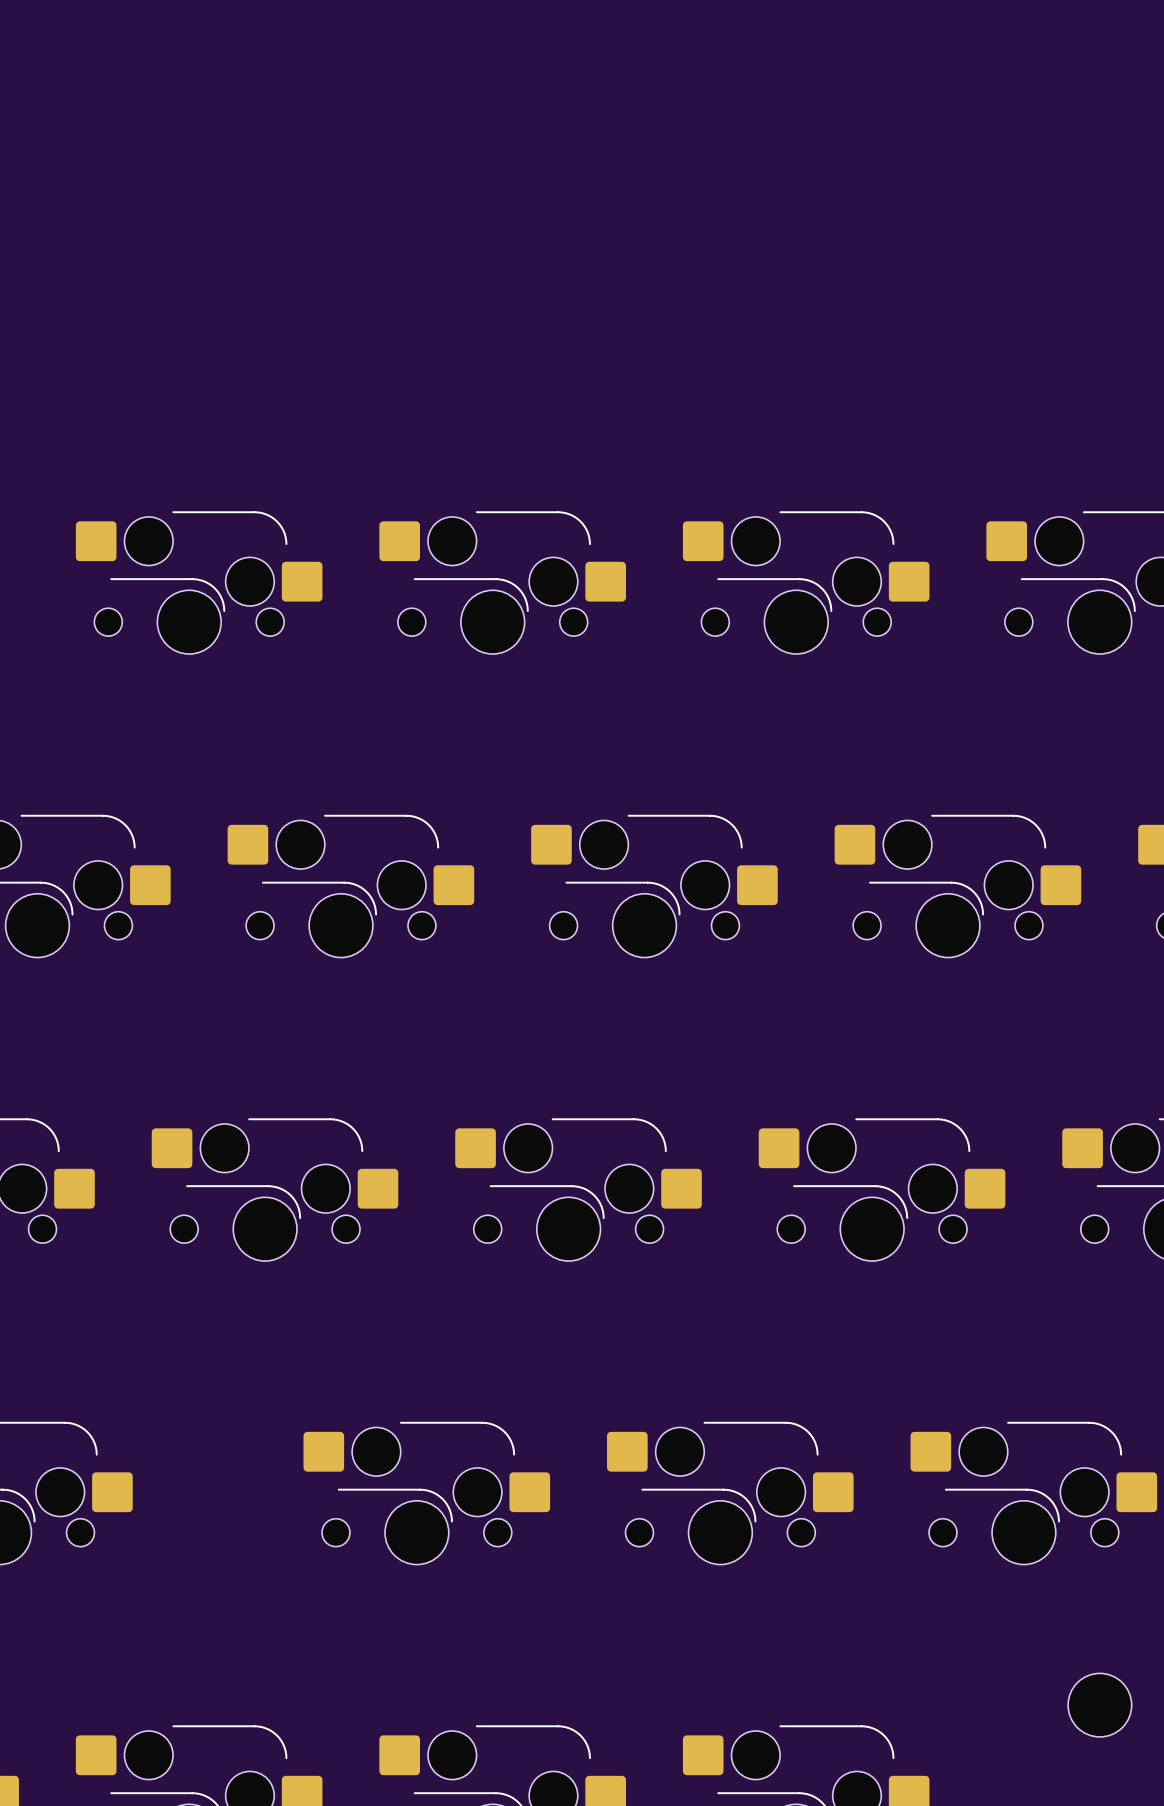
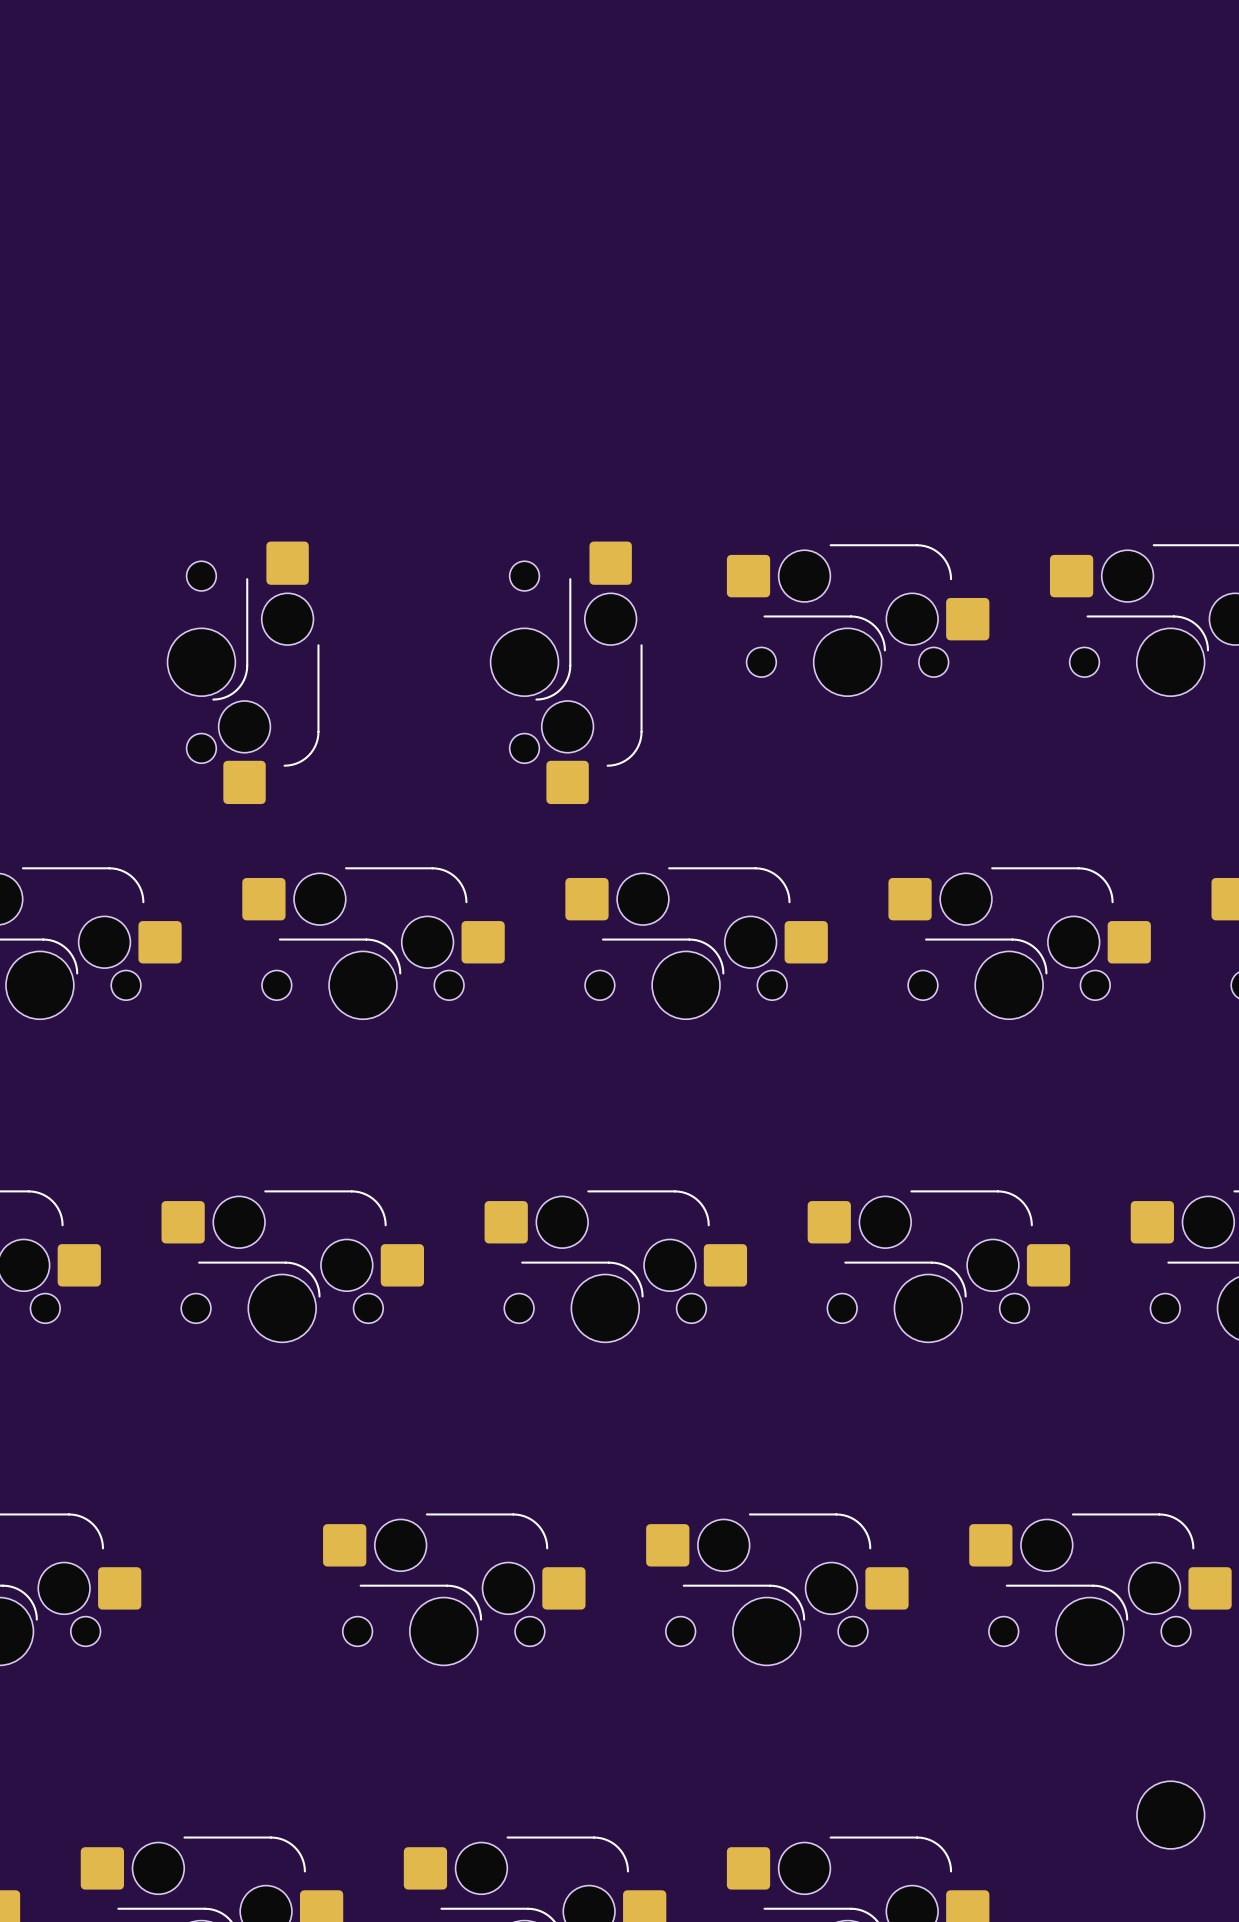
part rotation: 0° (199, 582) -> 90° clockwise (243, 672)
part rotation: 0° (502, 582) -> 90° clockwise (566, 672)

